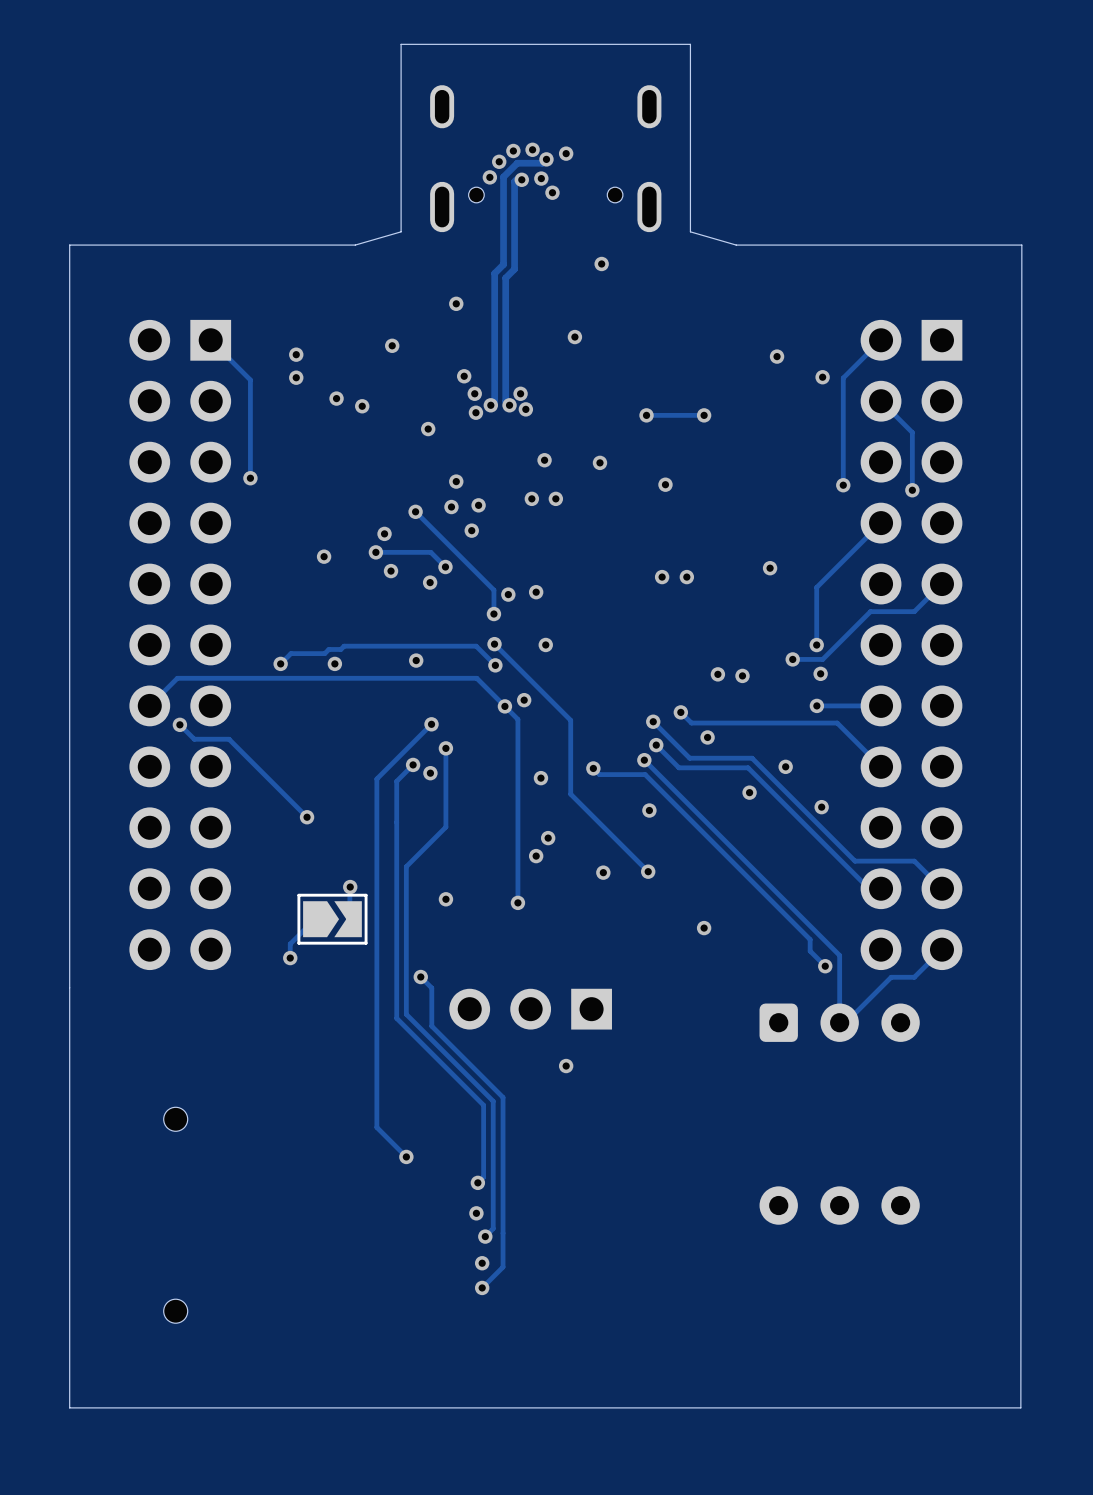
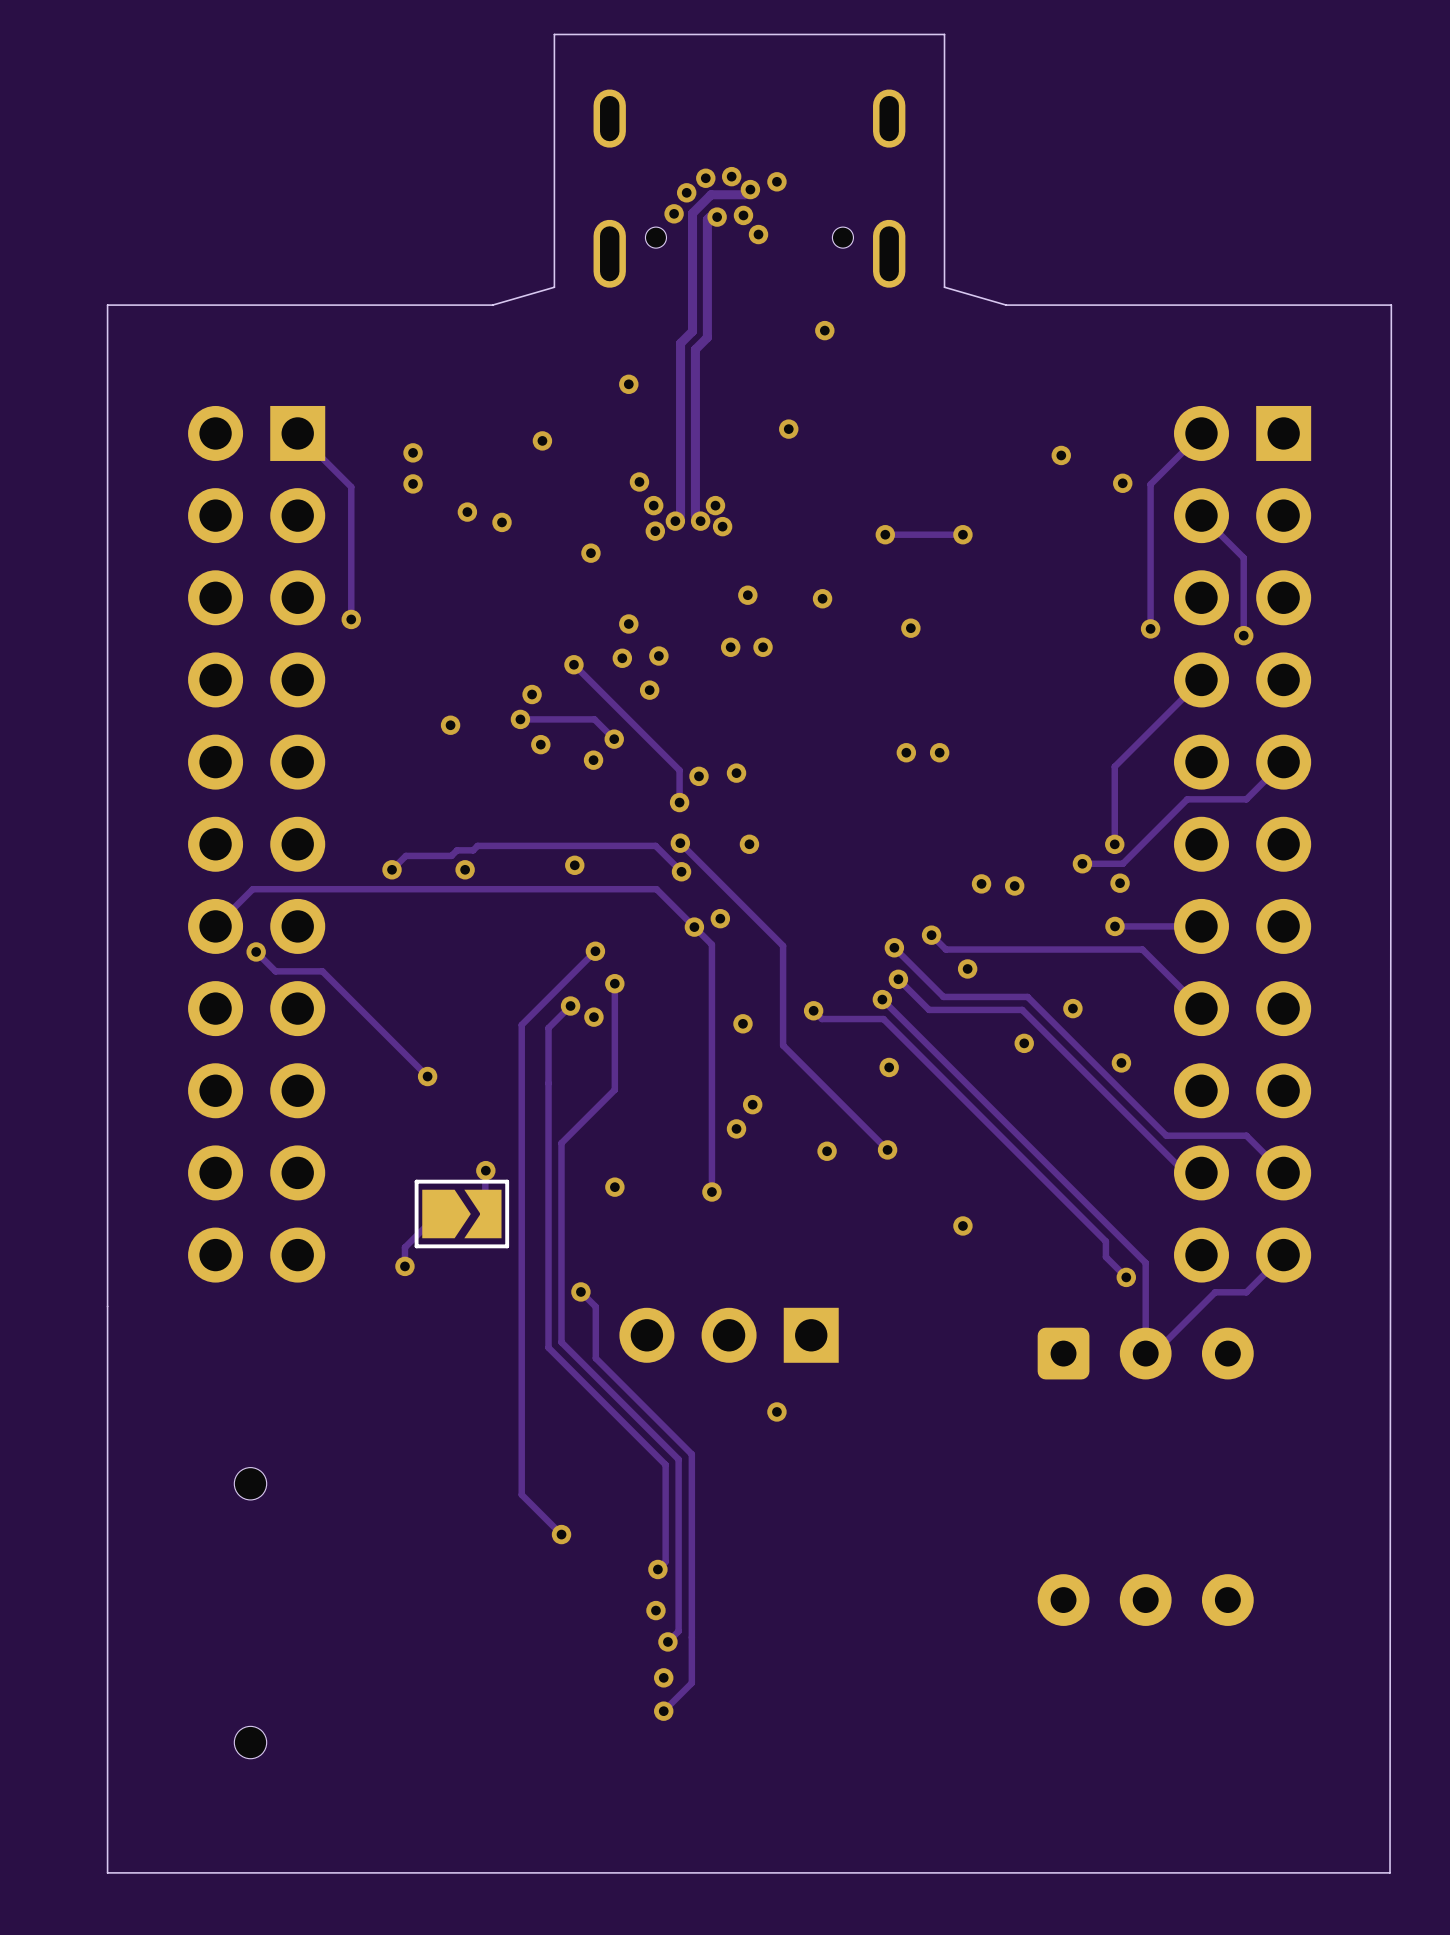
via: (770, 568) -> none

